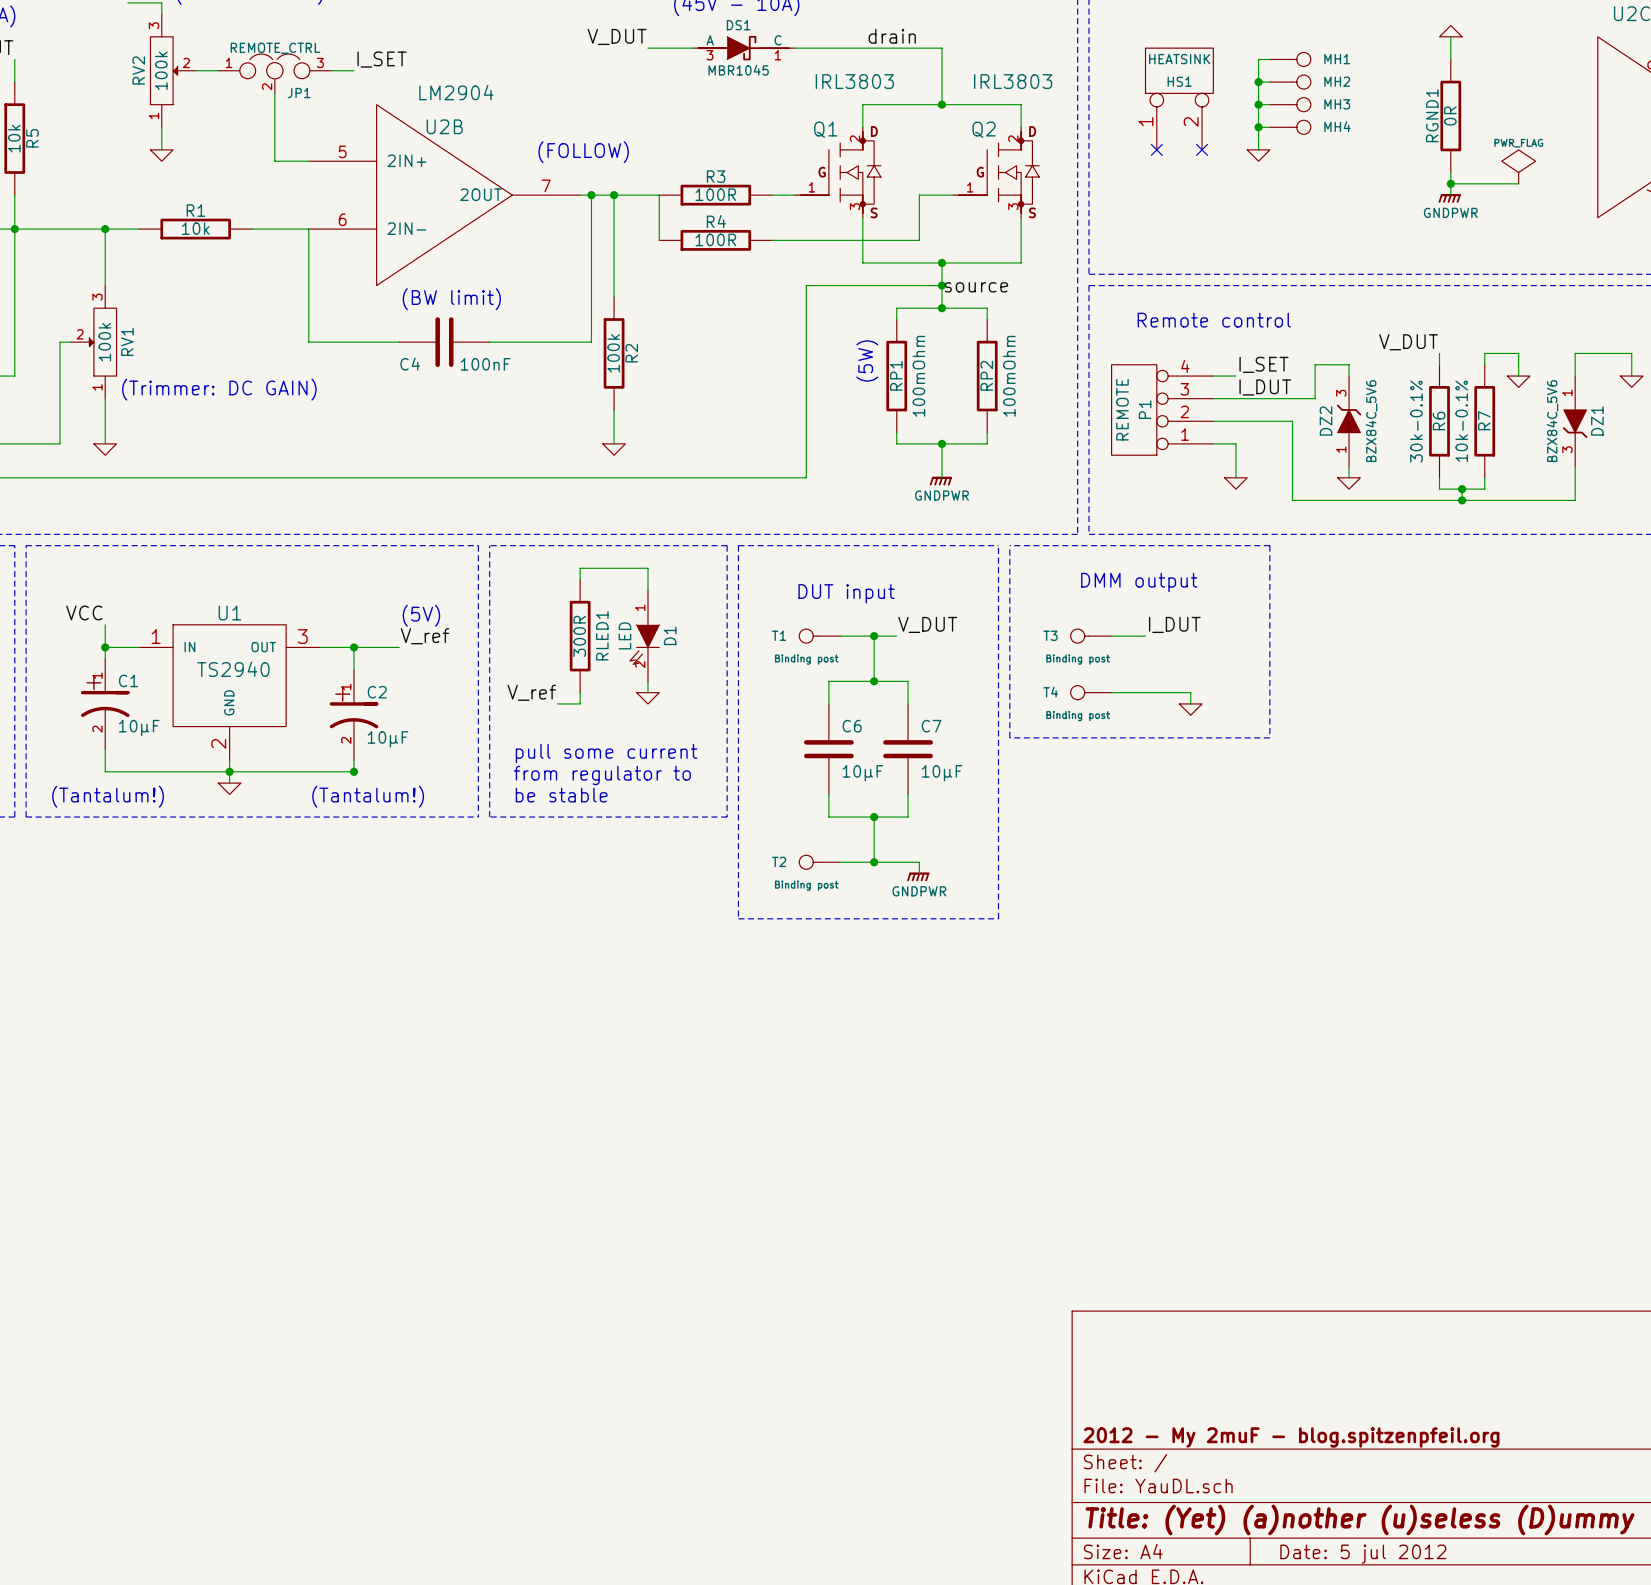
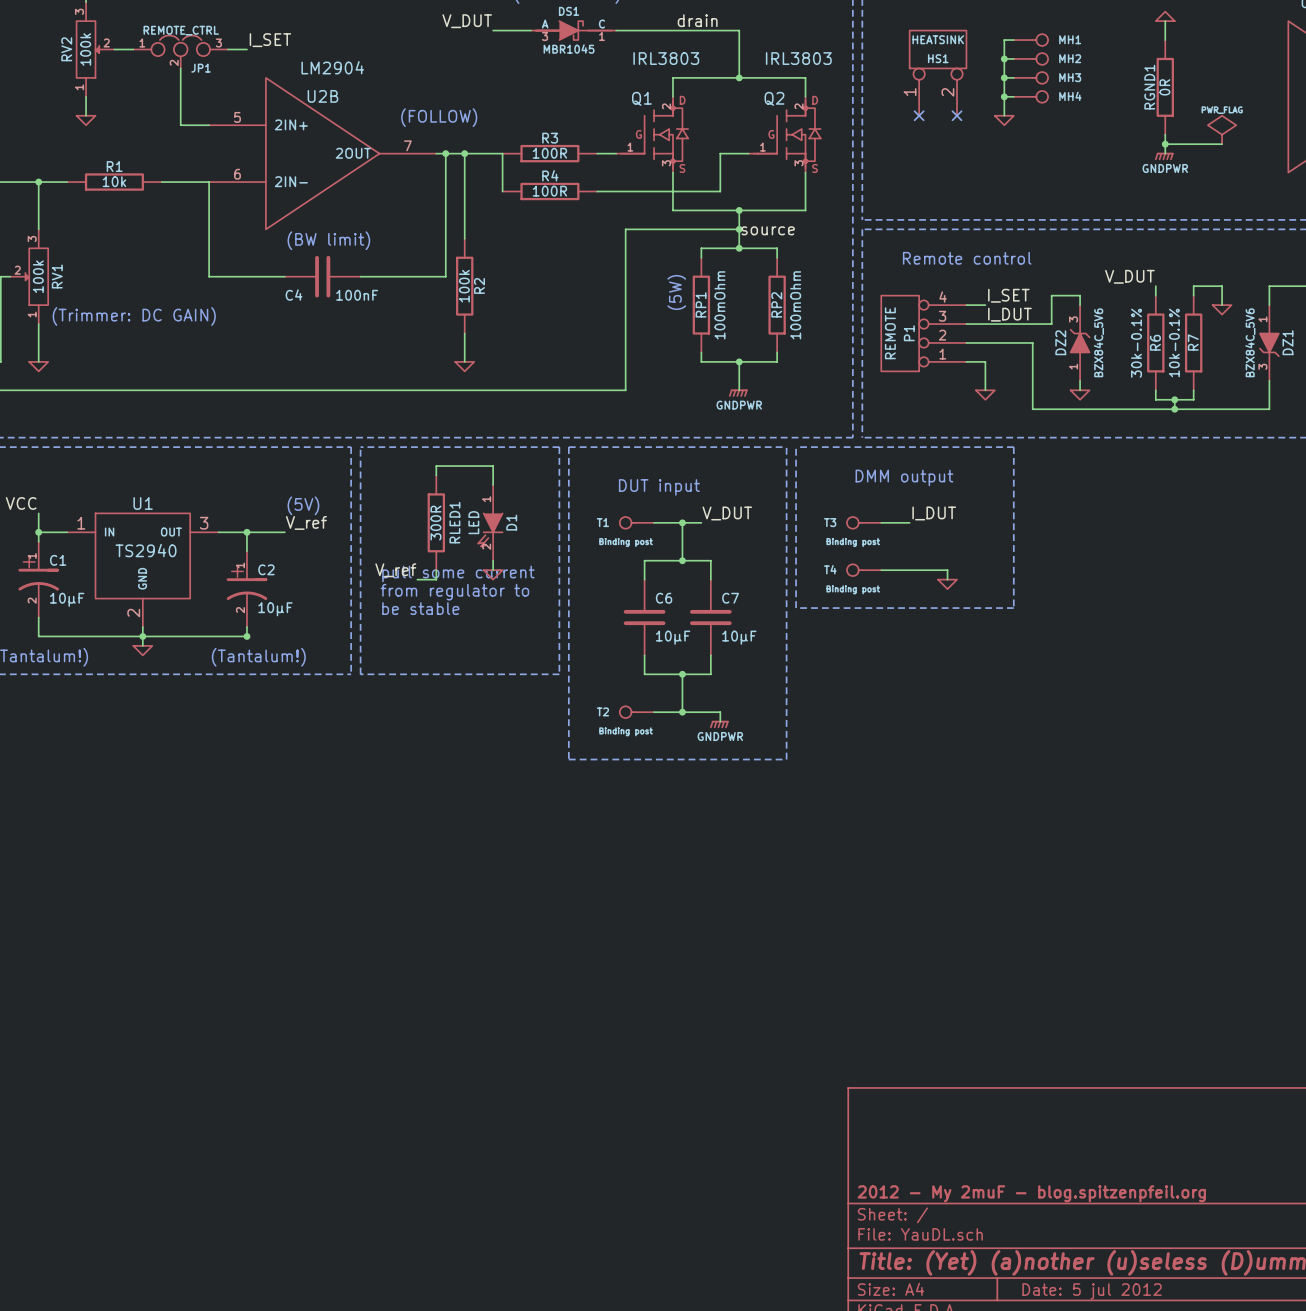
text position: pull some current (606, 753) -> pull some current (458, 573)
text position: from regulator to (602, 775) -> from regulator to (454, 592)
text position: be stable (561, 795) -> be stable (420, 608)

